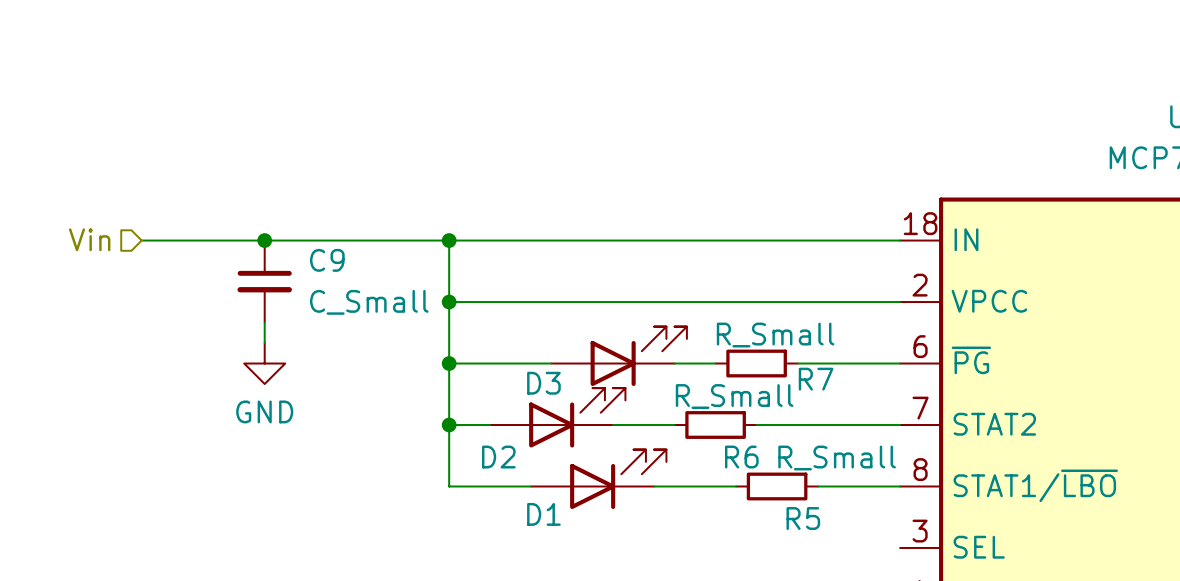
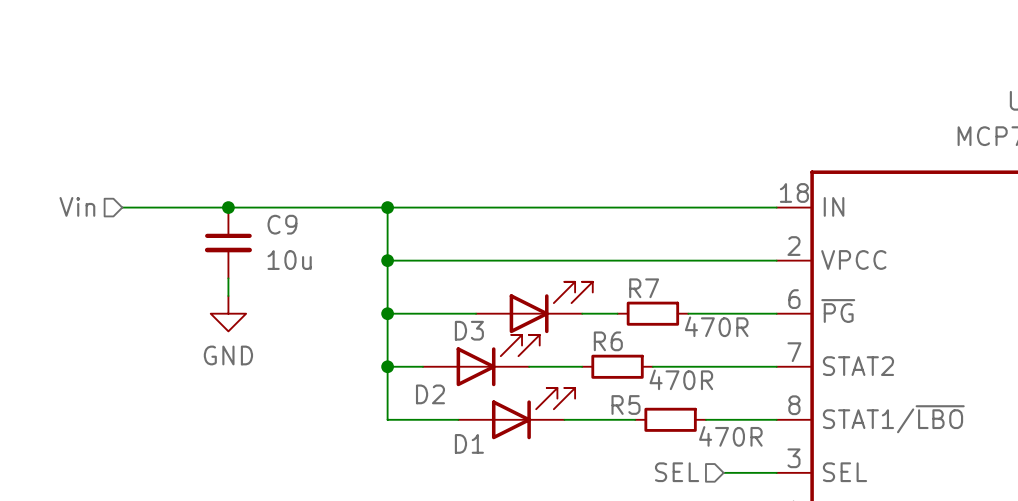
C9 value: C_Small (369, 302) -> 10u (289, 260)
R7 value: R_Small (775, 335) -> 470R (716, 326)
R7 name position: R7 (816, 379) -> R7 (644, 288)
R6 value: R_Small (734, 396) -> 470R (681, 379)
R6 name position: R6 (741, 457) -> R6 (608, 341)
R5 value: R_Small (837, 458) -> 470R (730, 436)
R5 name position: R5 (803, 518) -> R5 (626, 405)
hierarchical label: none -> SEL (677, 472)
wire: none -> (723, 472) (776, 472)

